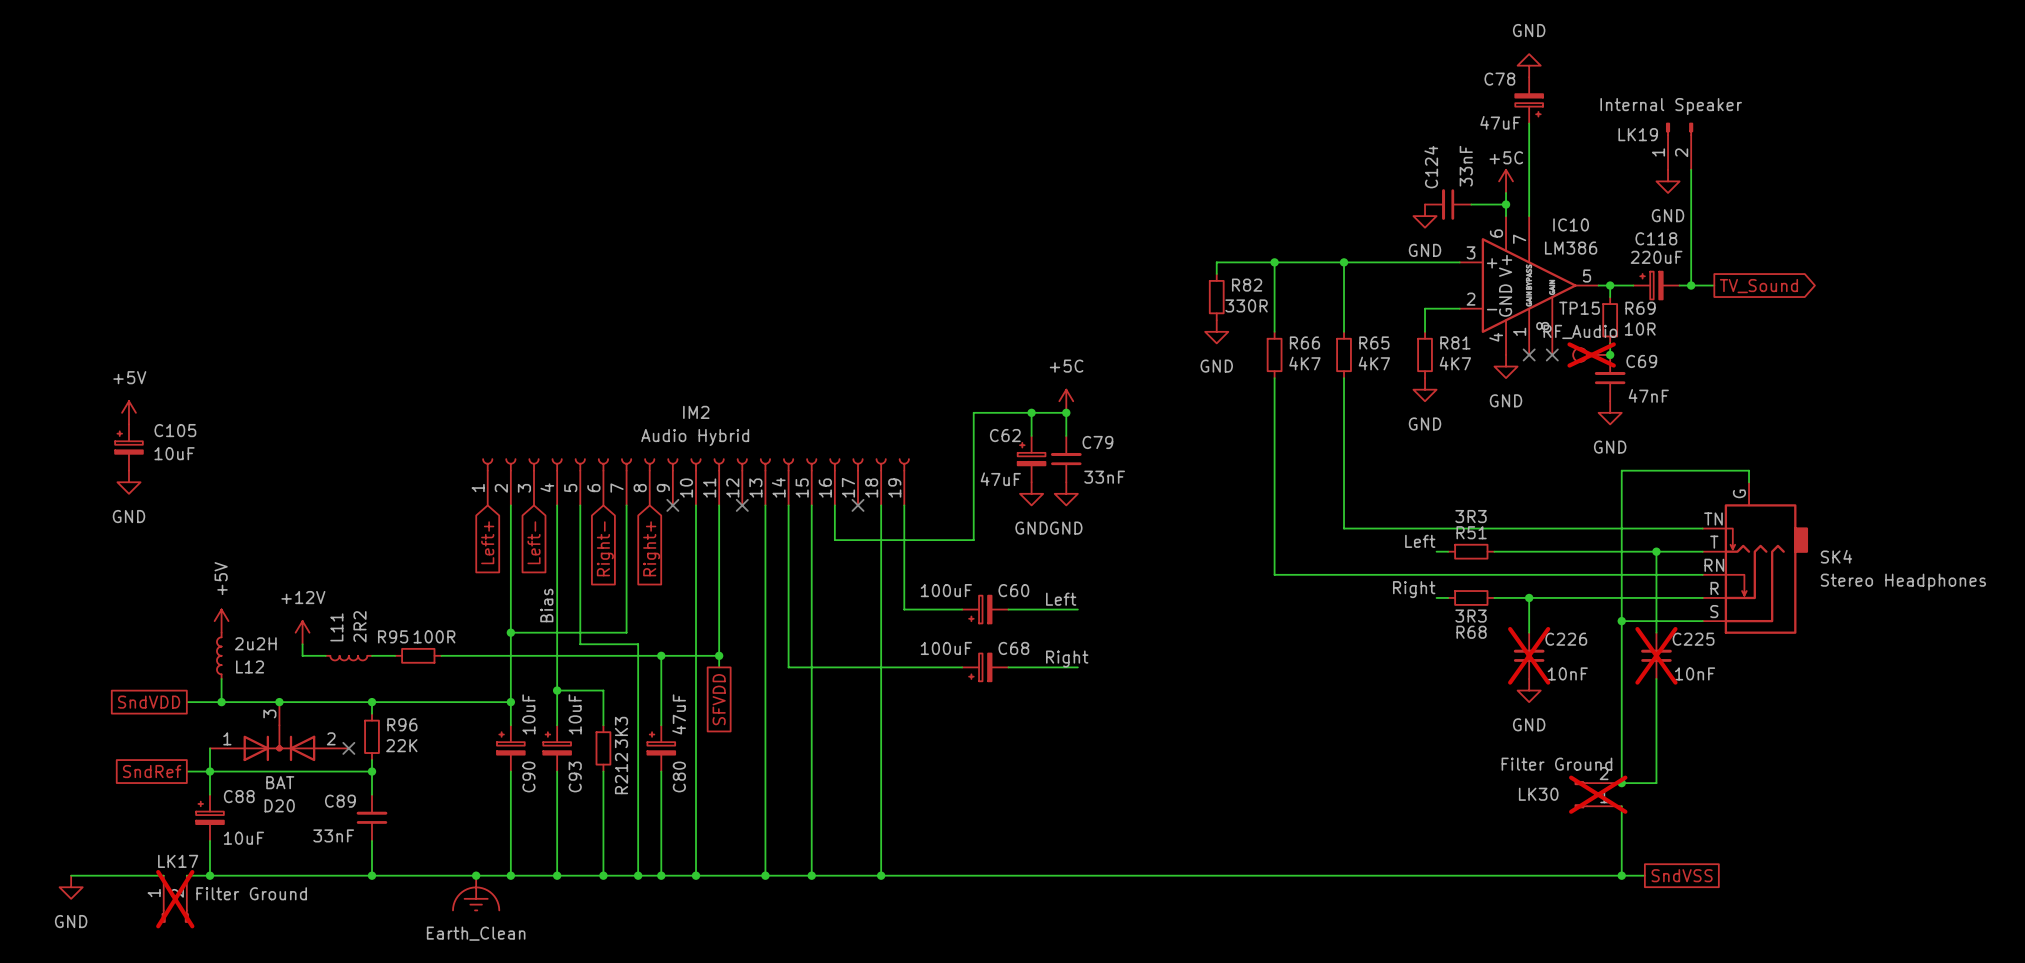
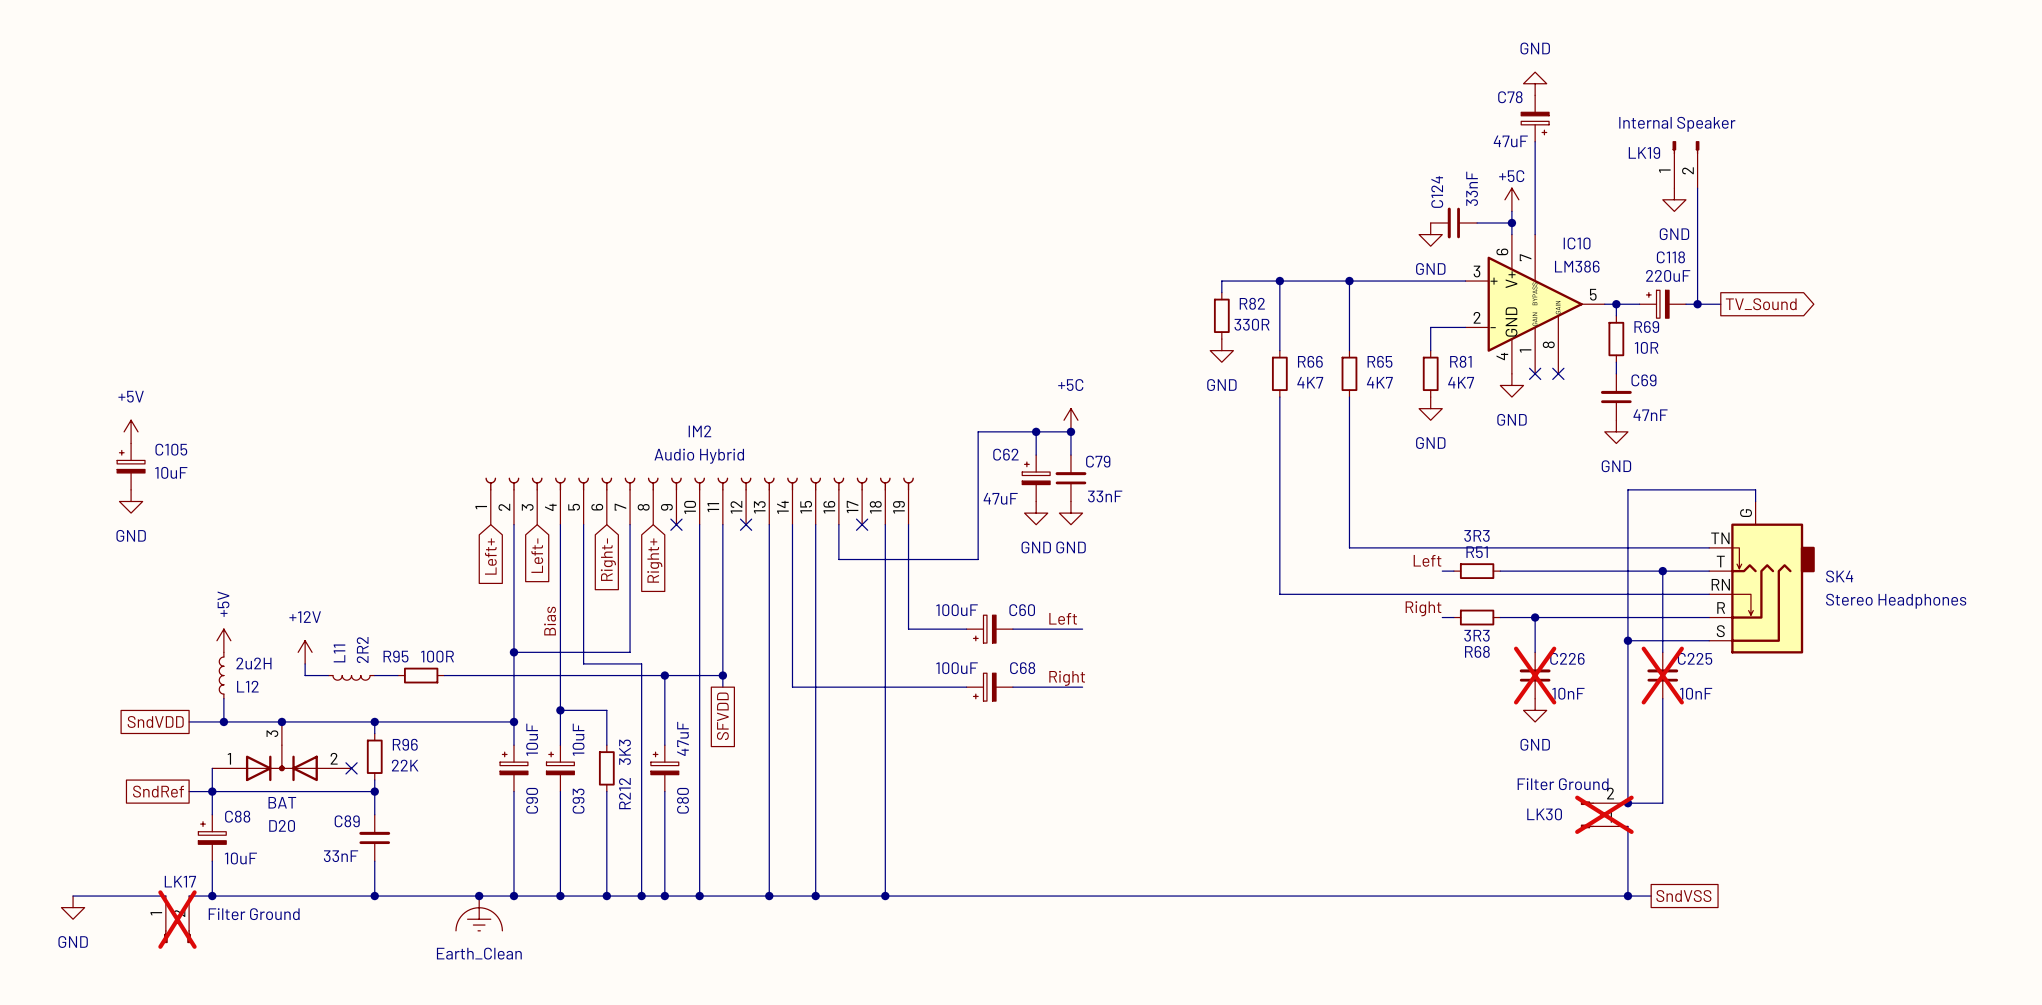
TP15: RF_Audio (1591, 354) -> none
junction: (1610, 354) -> none

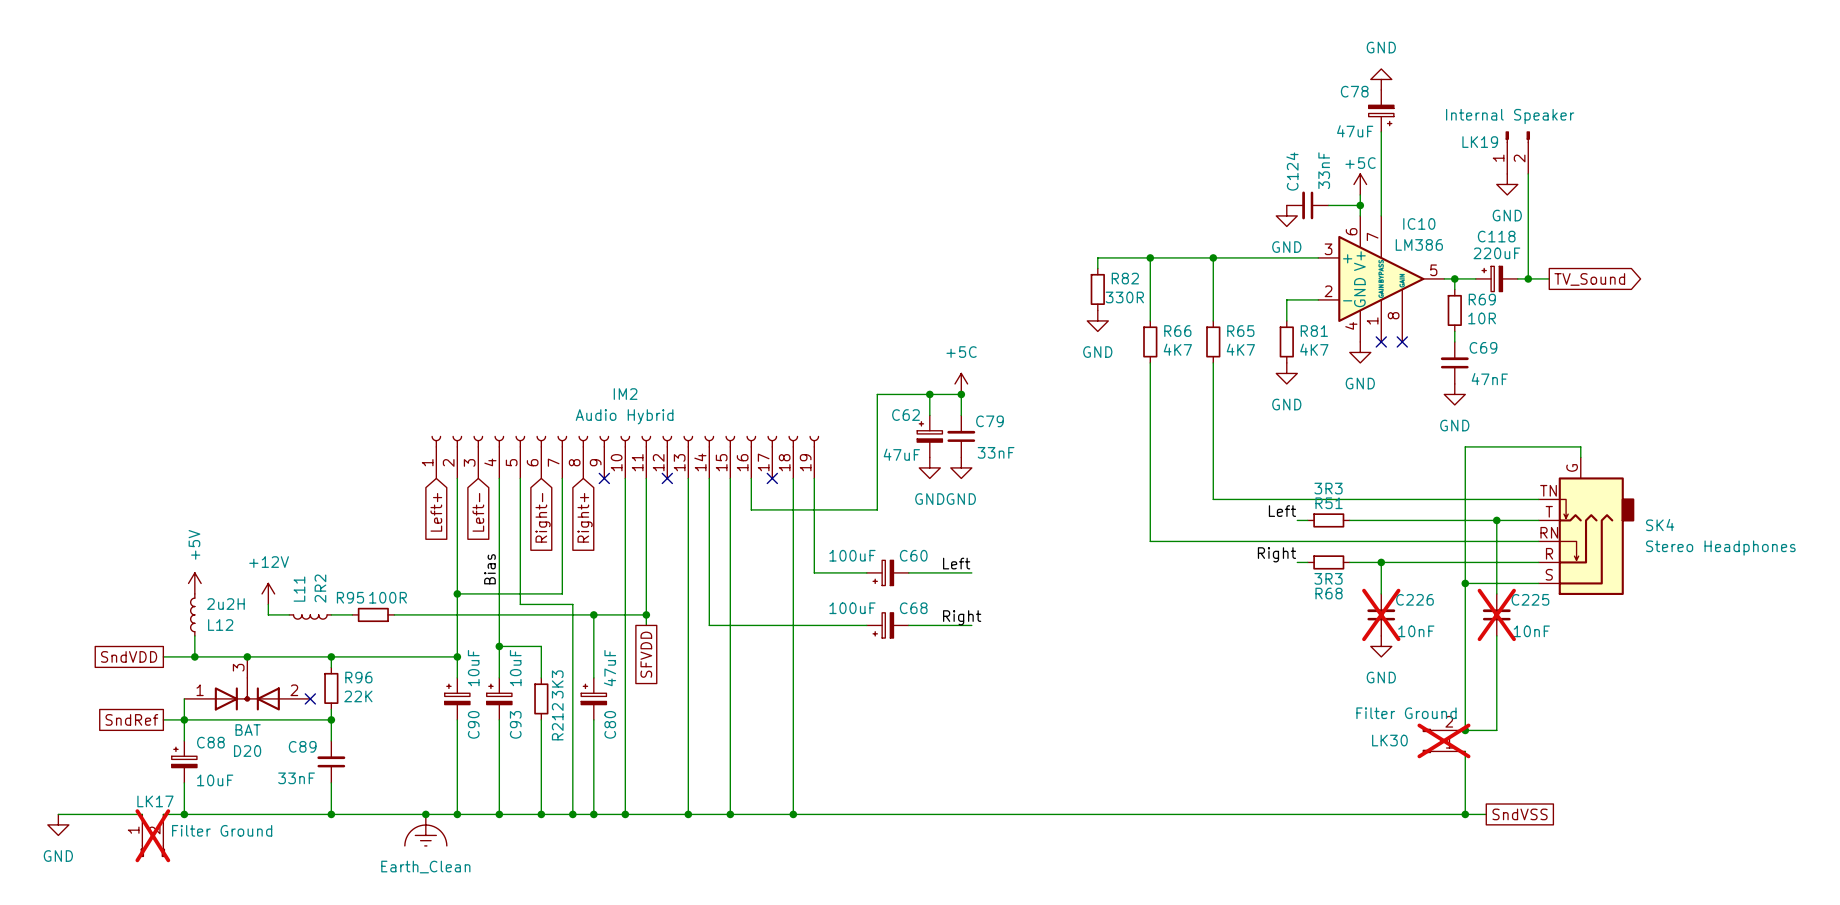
power symbol: +5V (131, 431) -> none
C105: 10uF (131, 466) -> none
power symbol: GND (131, 501) -> none

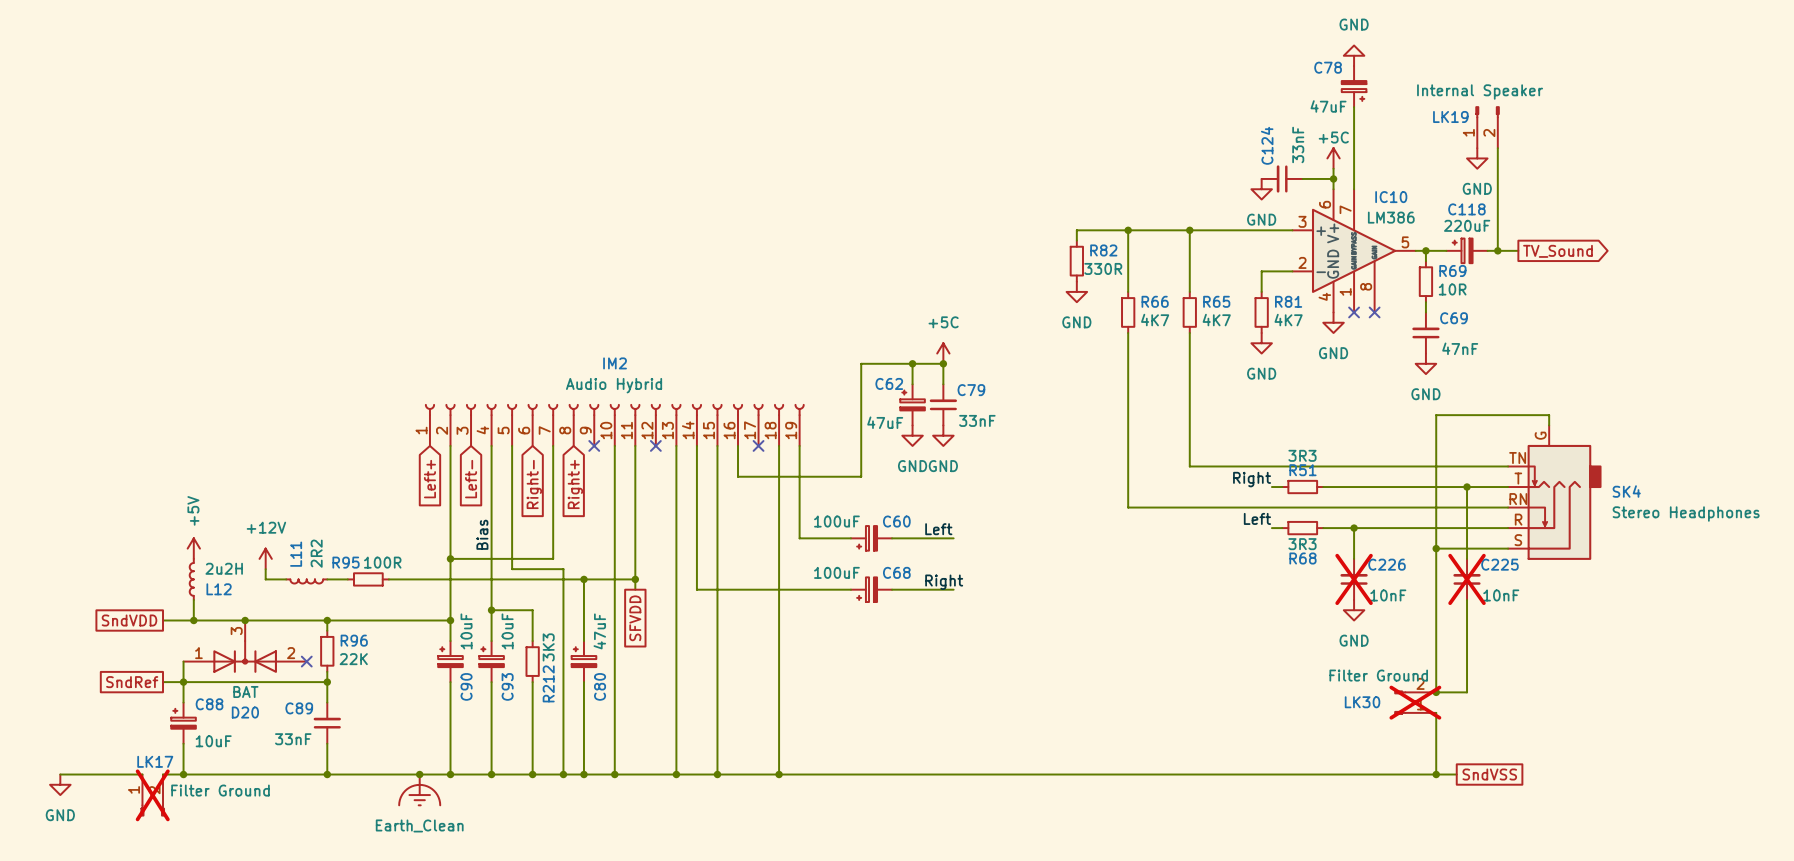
label: Left (1282, 511) -> Right (1252, 479)
label: Right (1276, 554) -> Left (1257, 518)

